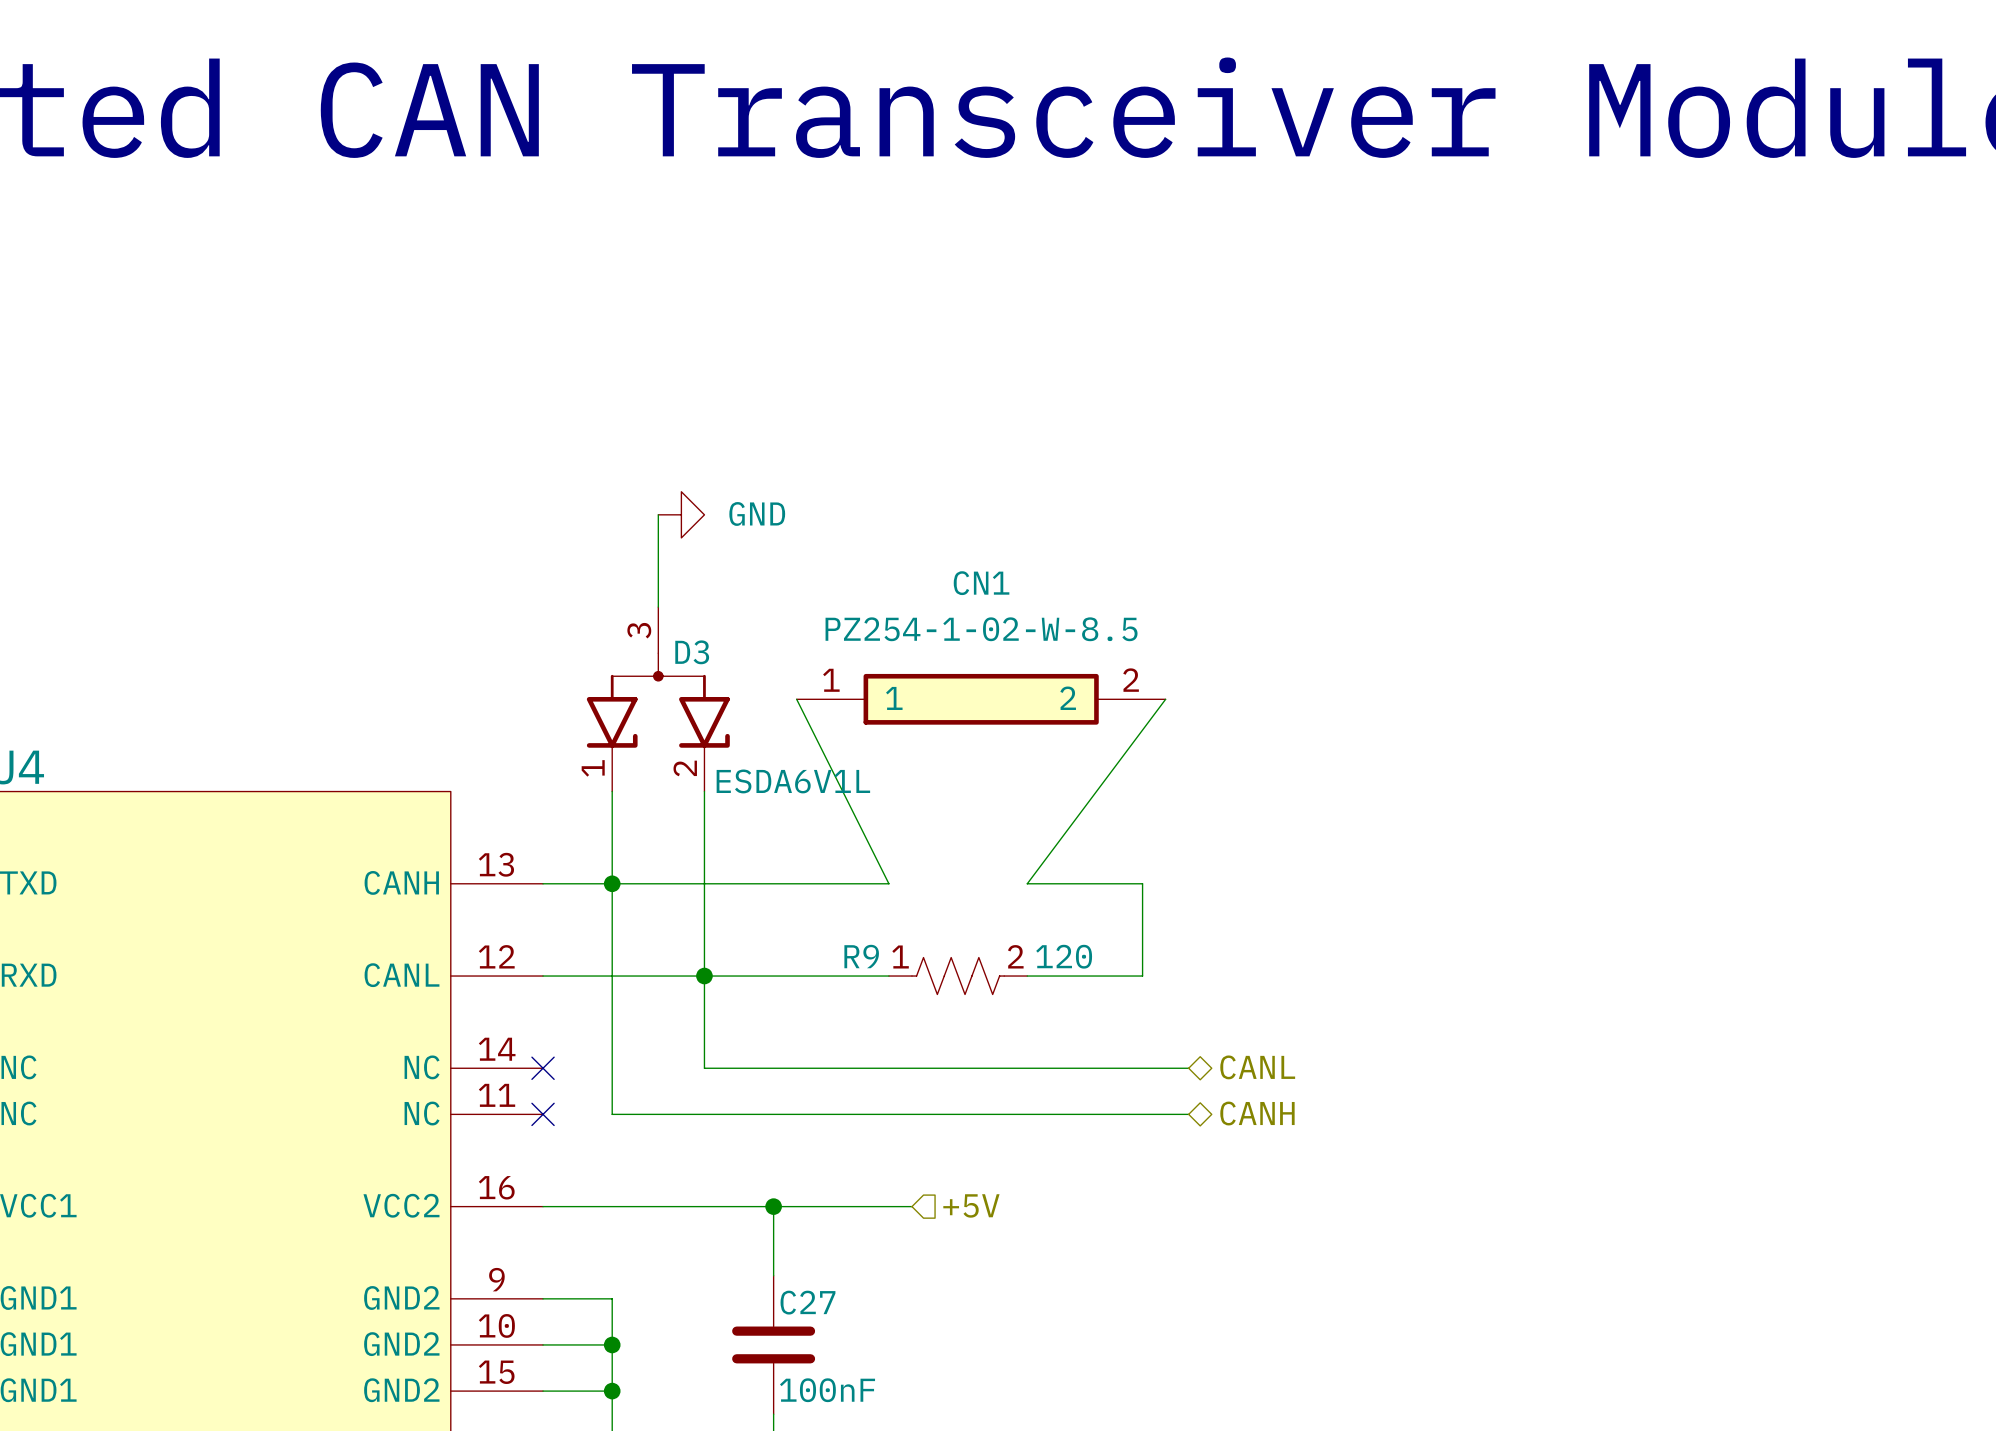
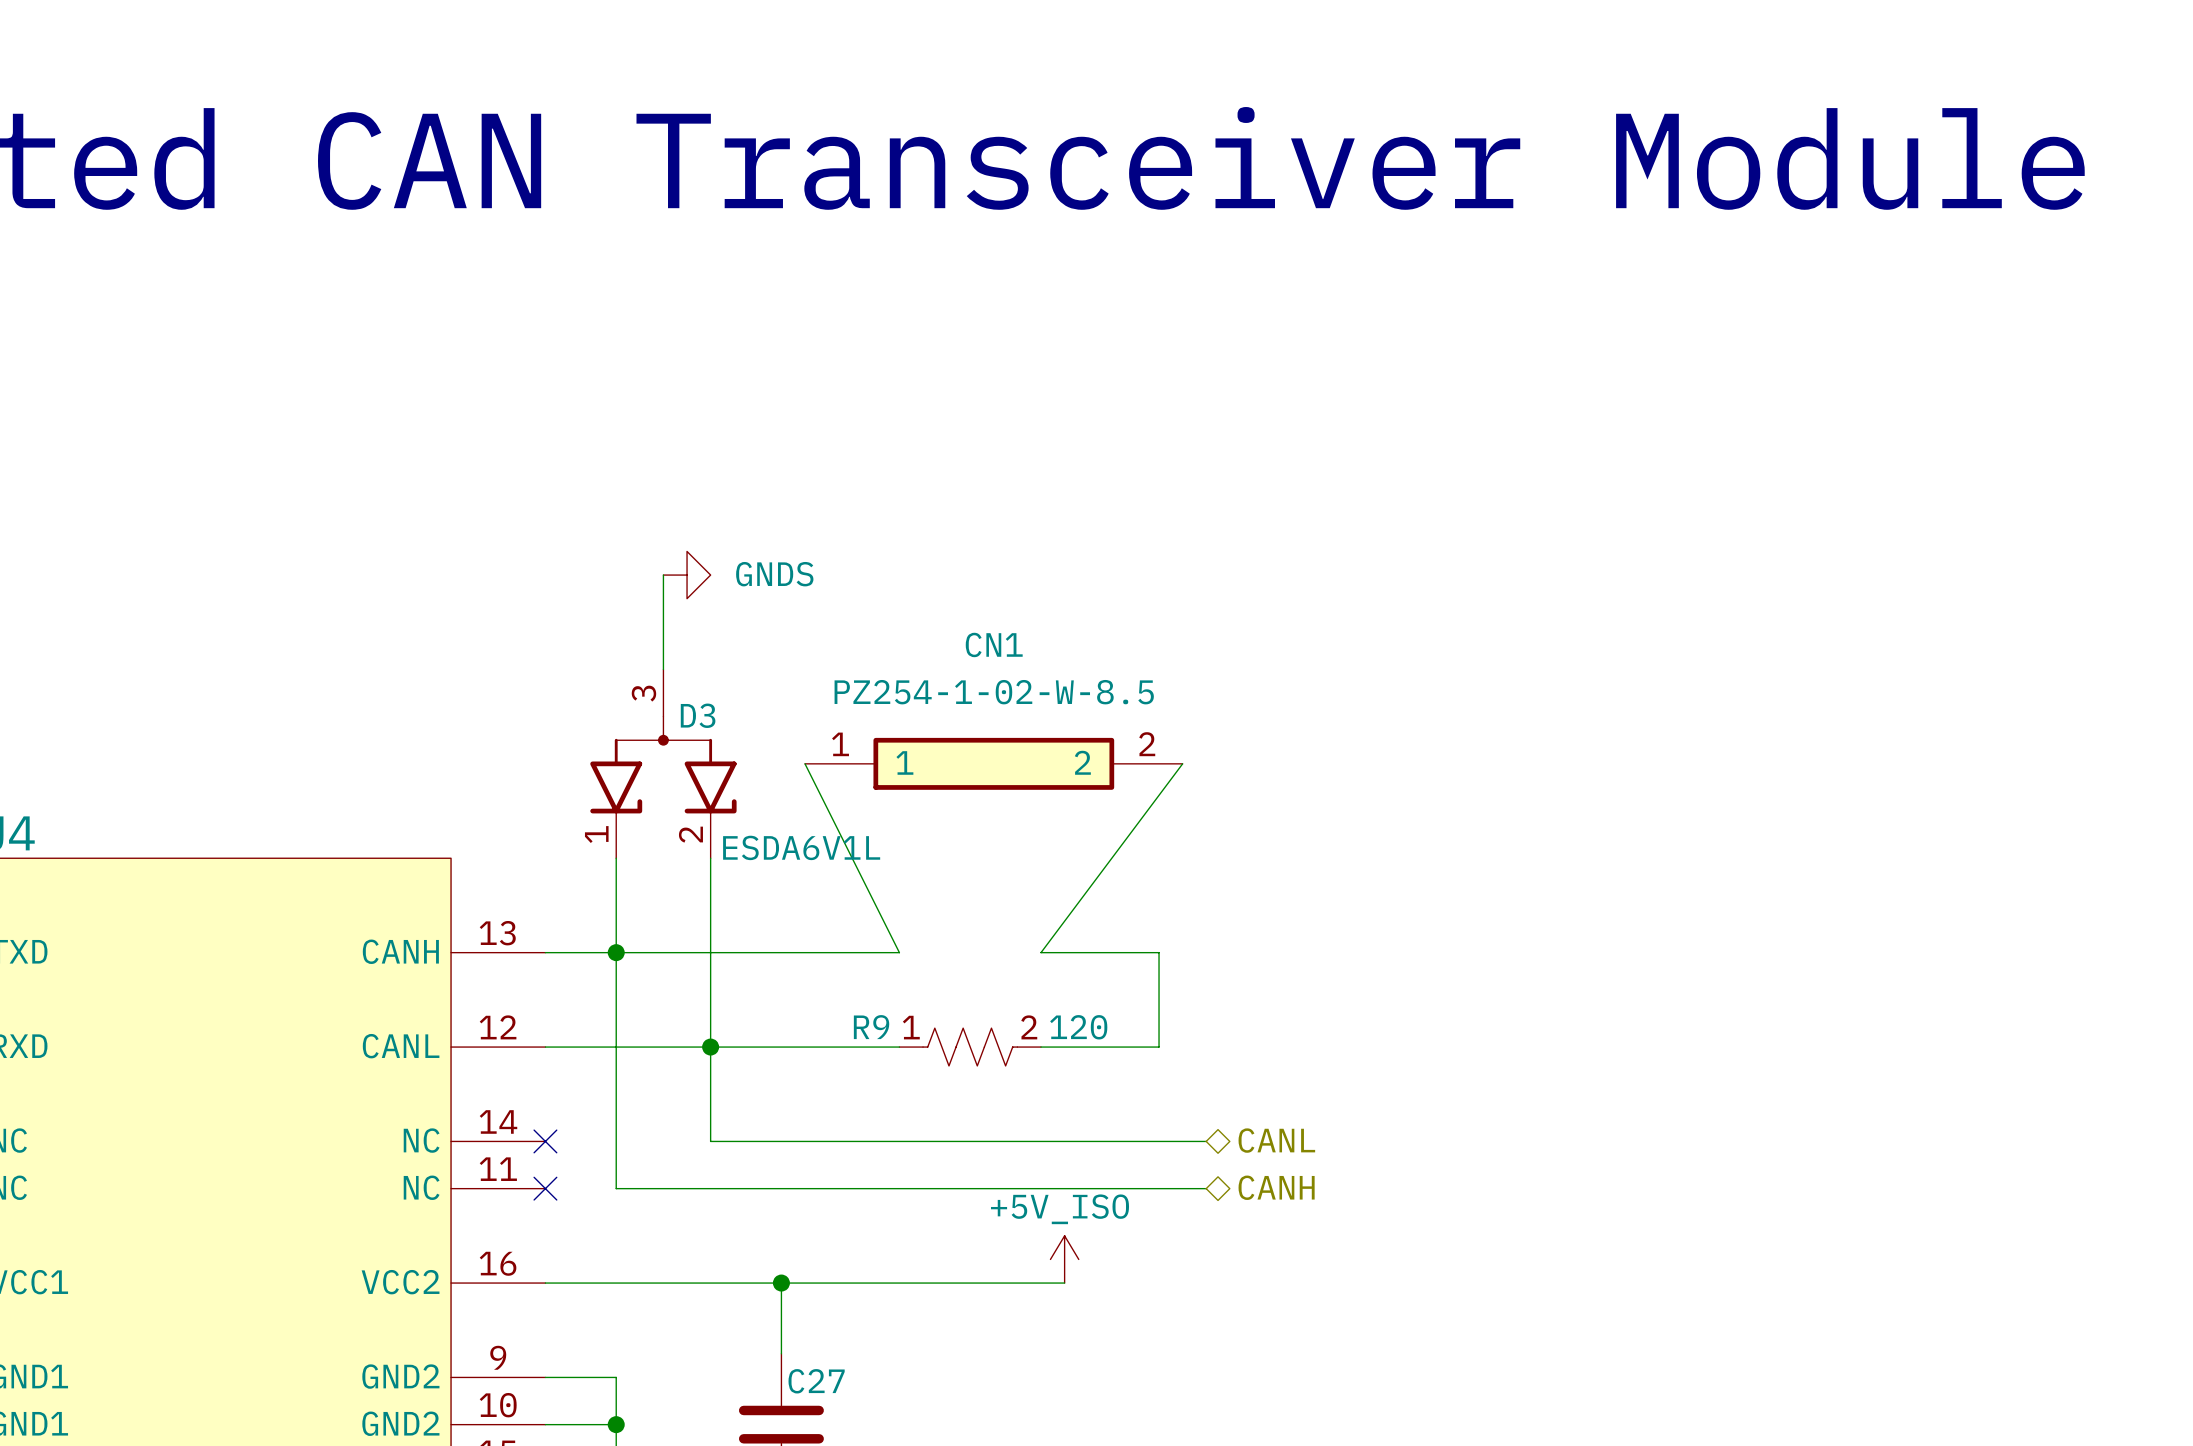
power symbol: GND (681, 514) -> GNDS (687, 575)
power symbol: none -> +5V_ISO (1064, 1259)
hierarchical label: +5V (971, 1205) -> none
wire: none -> (923, 1283) (1064, 1283)

